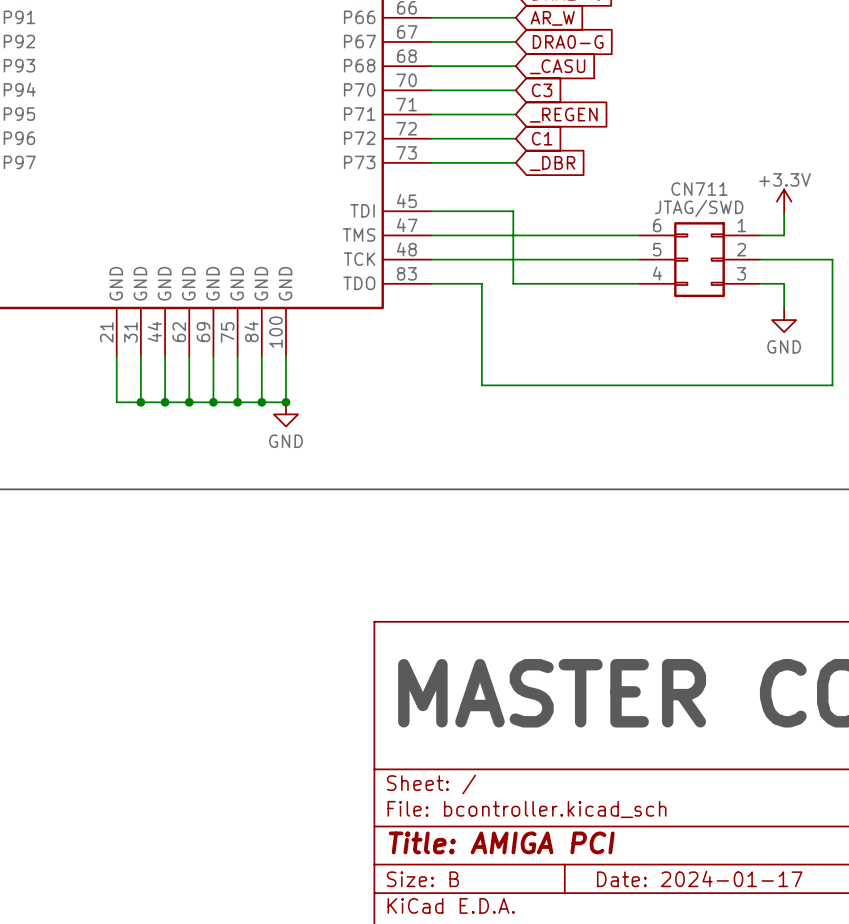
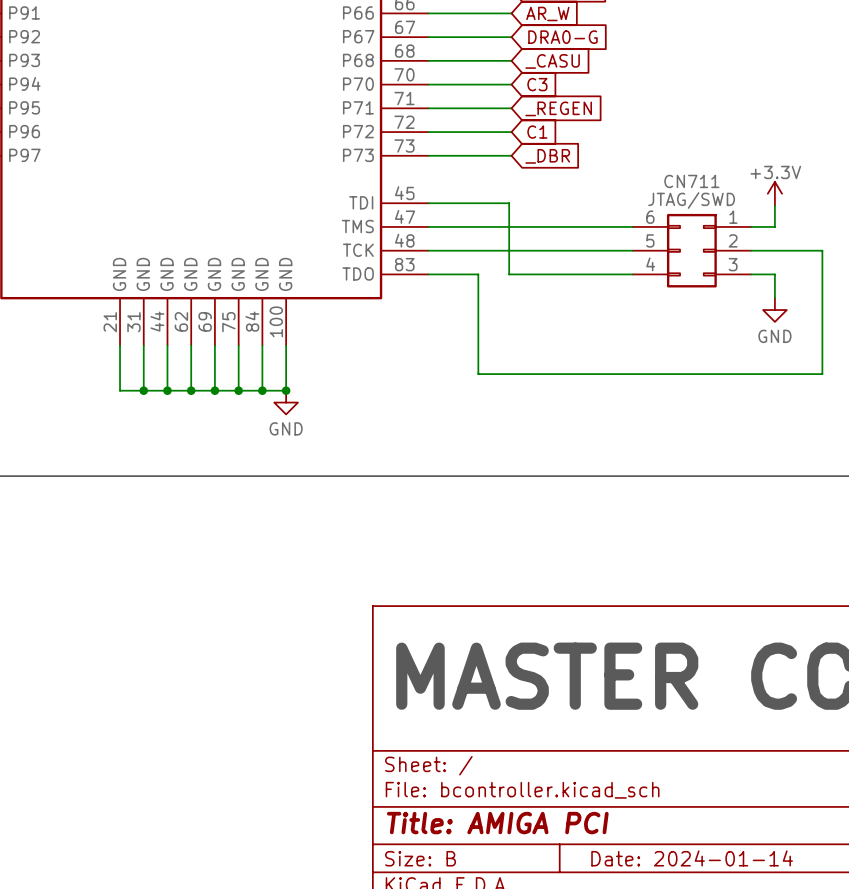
title block: Date: 2024-01-17 (699, 878) -> Date: 2024-01-14 (692, 858)

